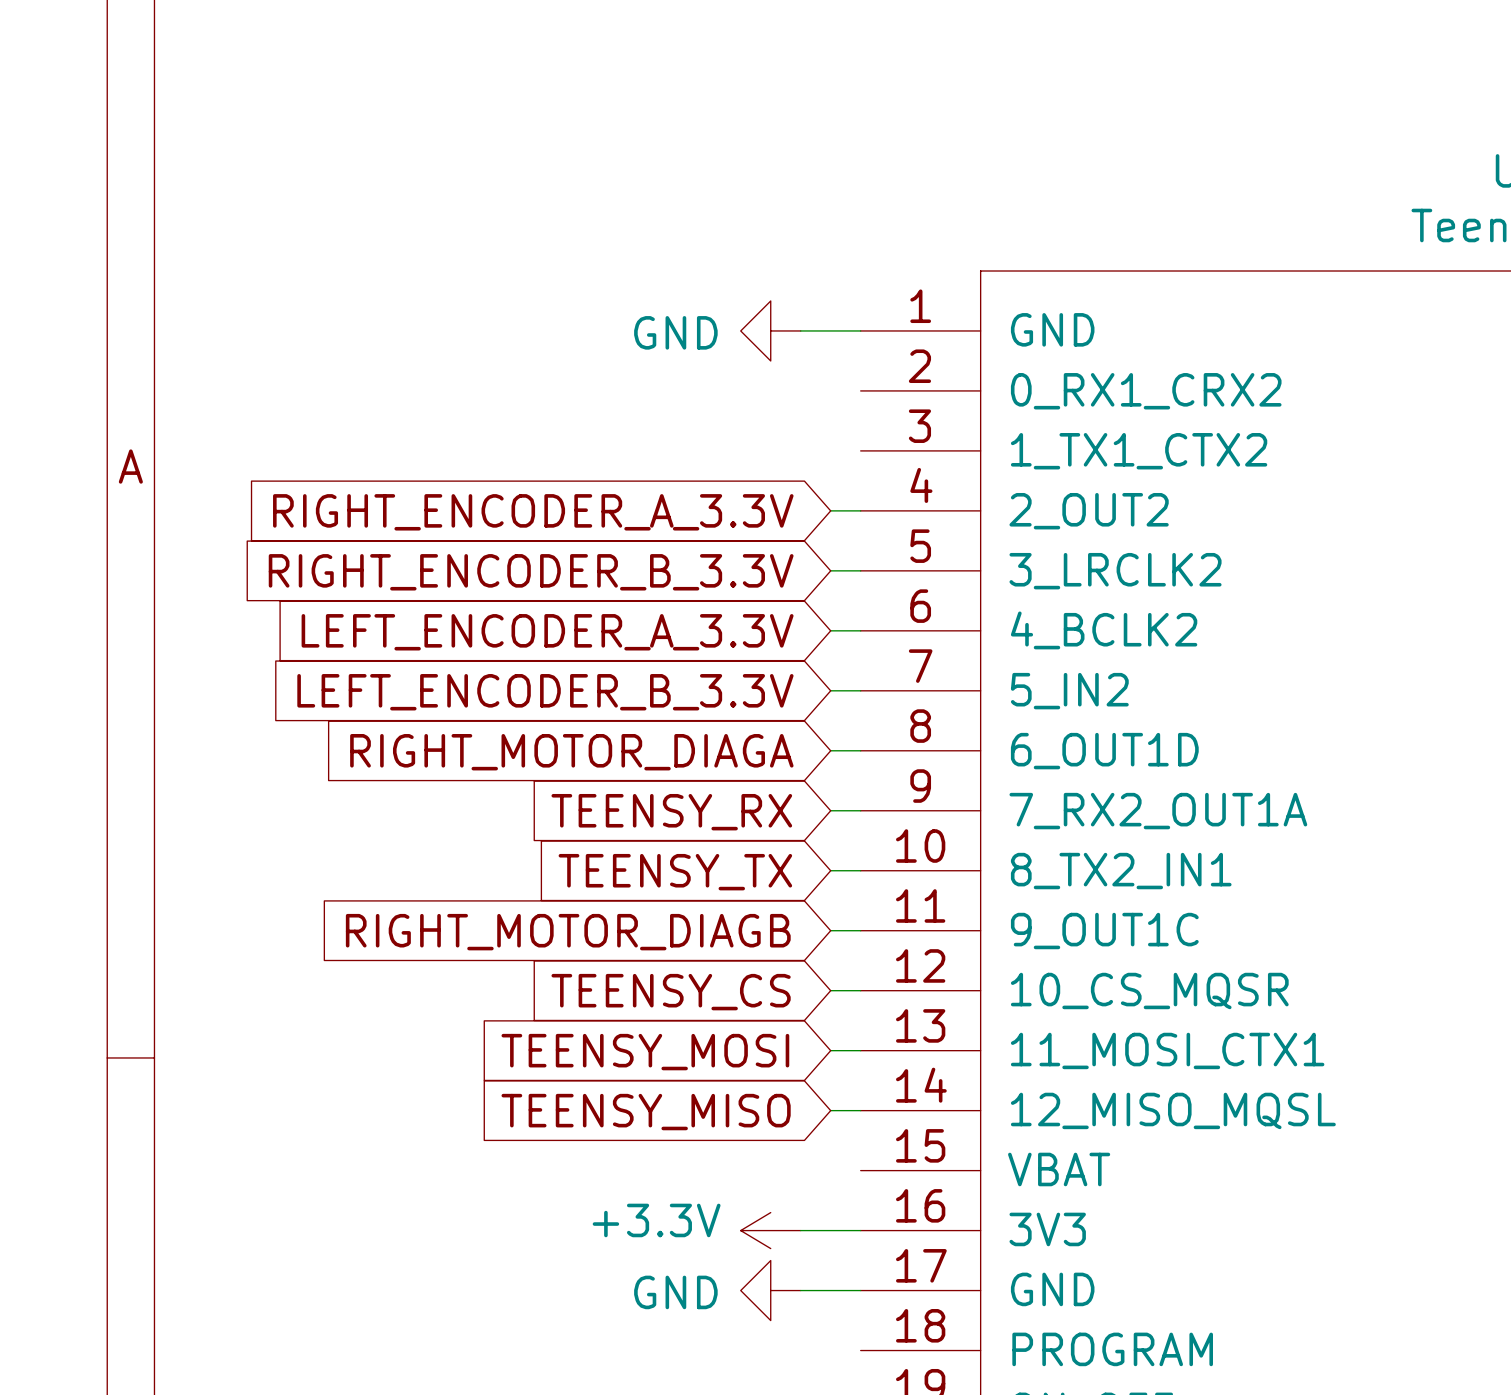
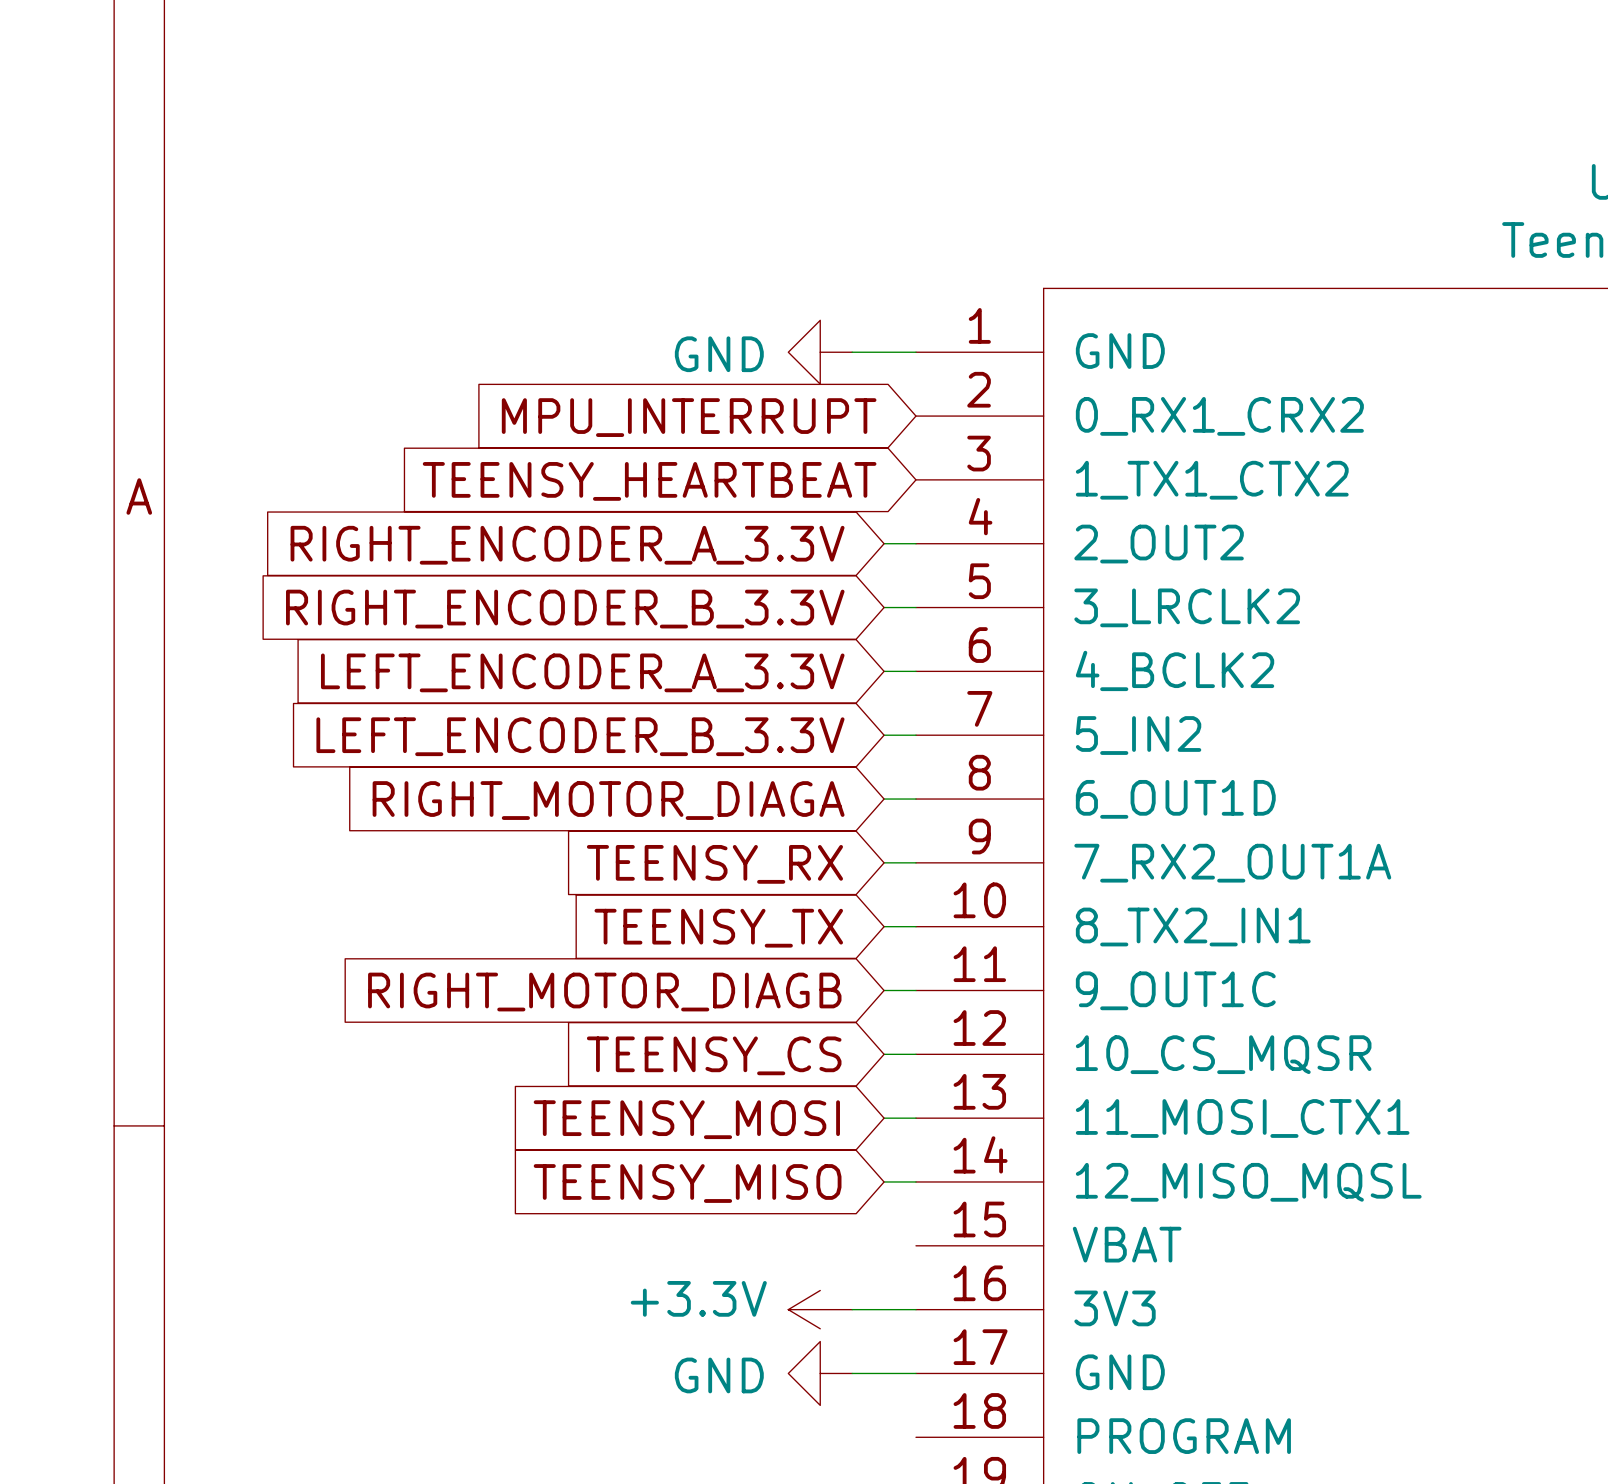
global label: none -> MPU_INTERRUPT (689, 417)
global label: none -> TEENSY_HEARTBEAT (649, 481)

